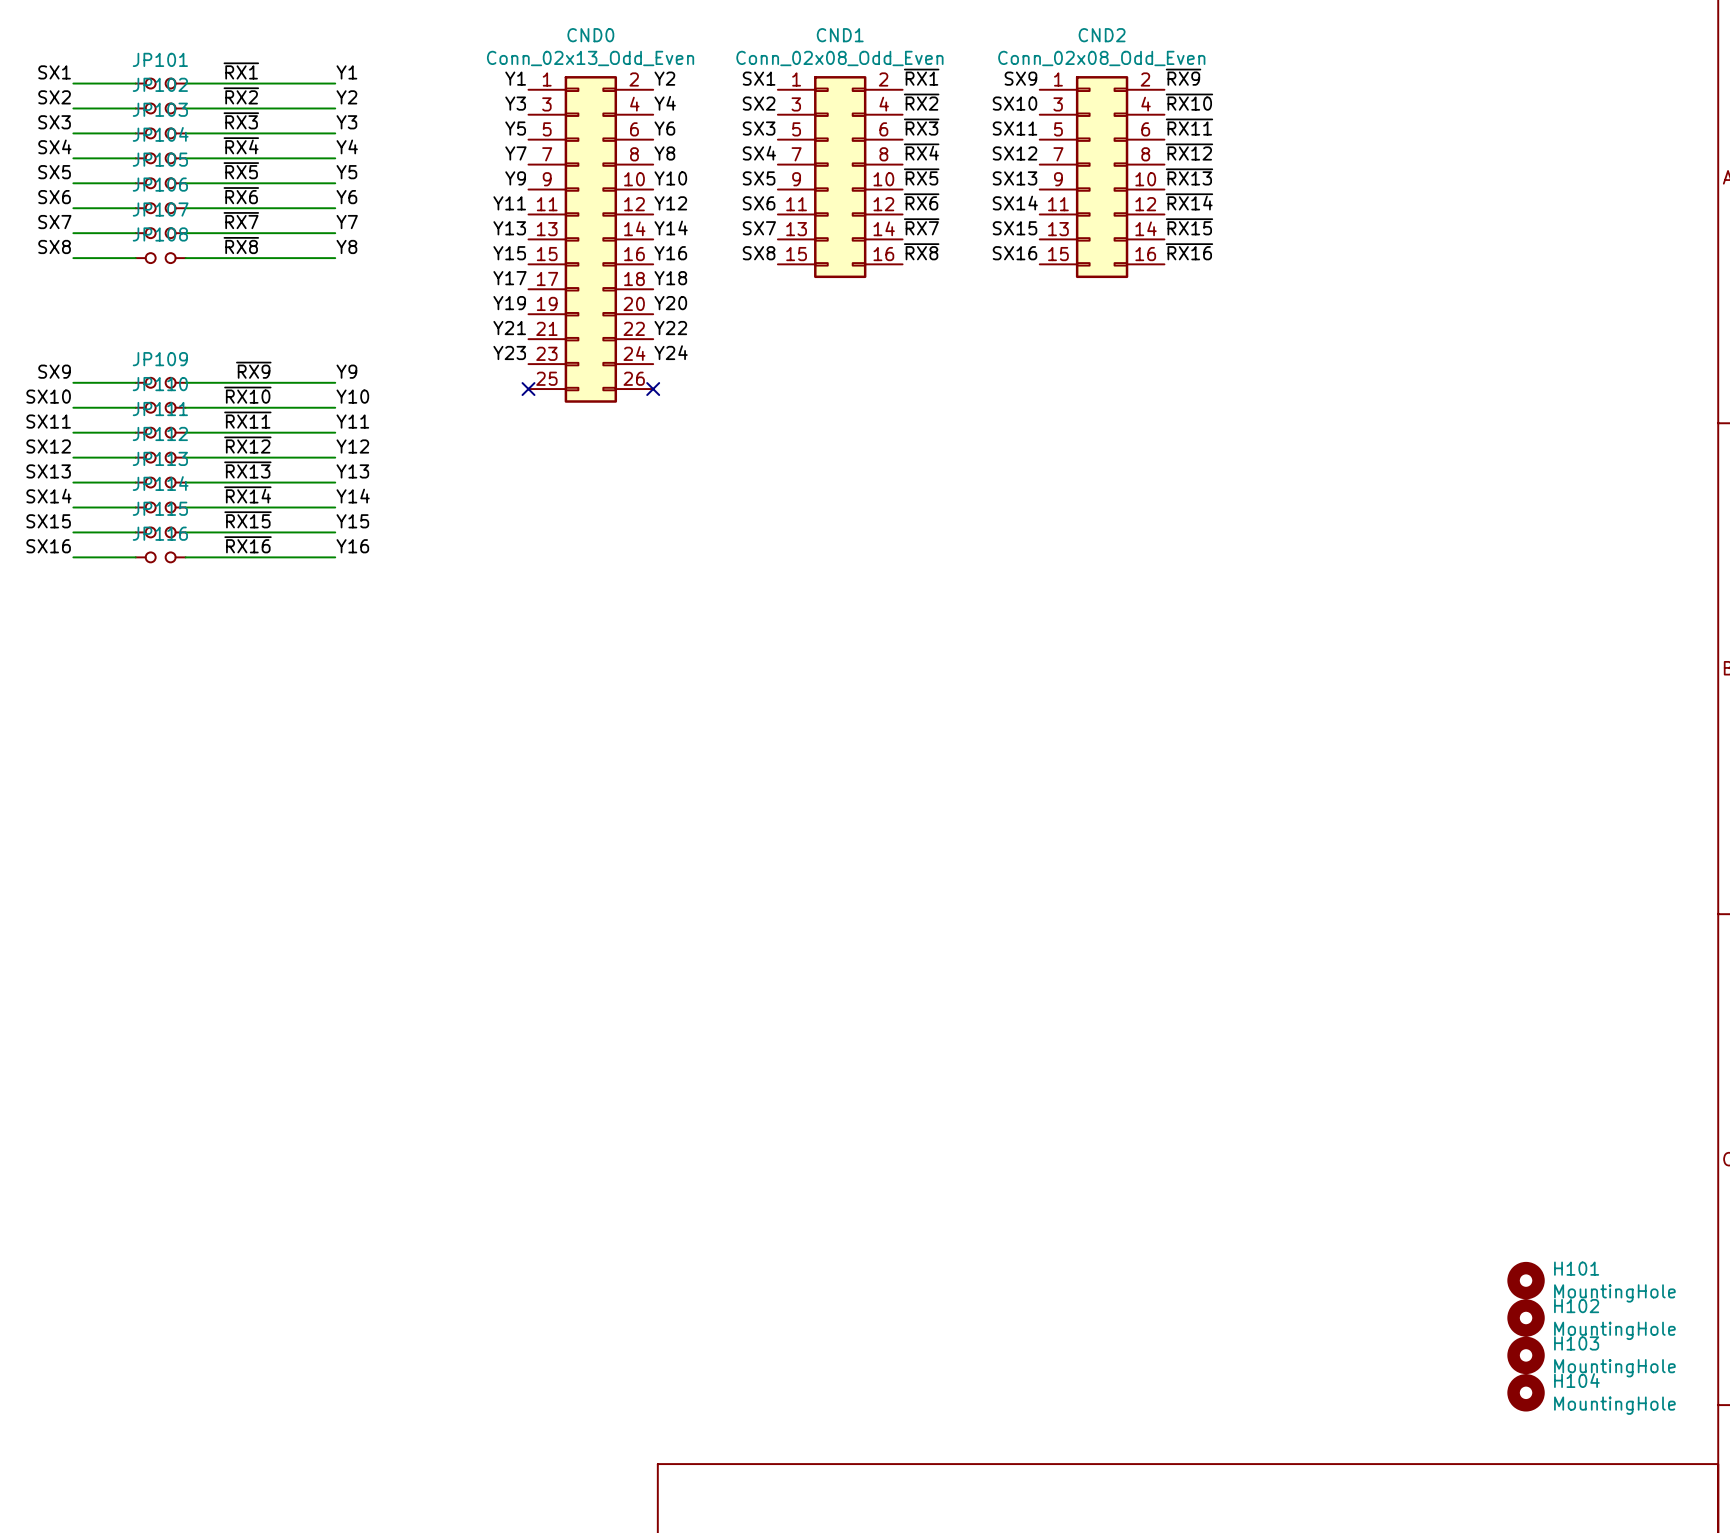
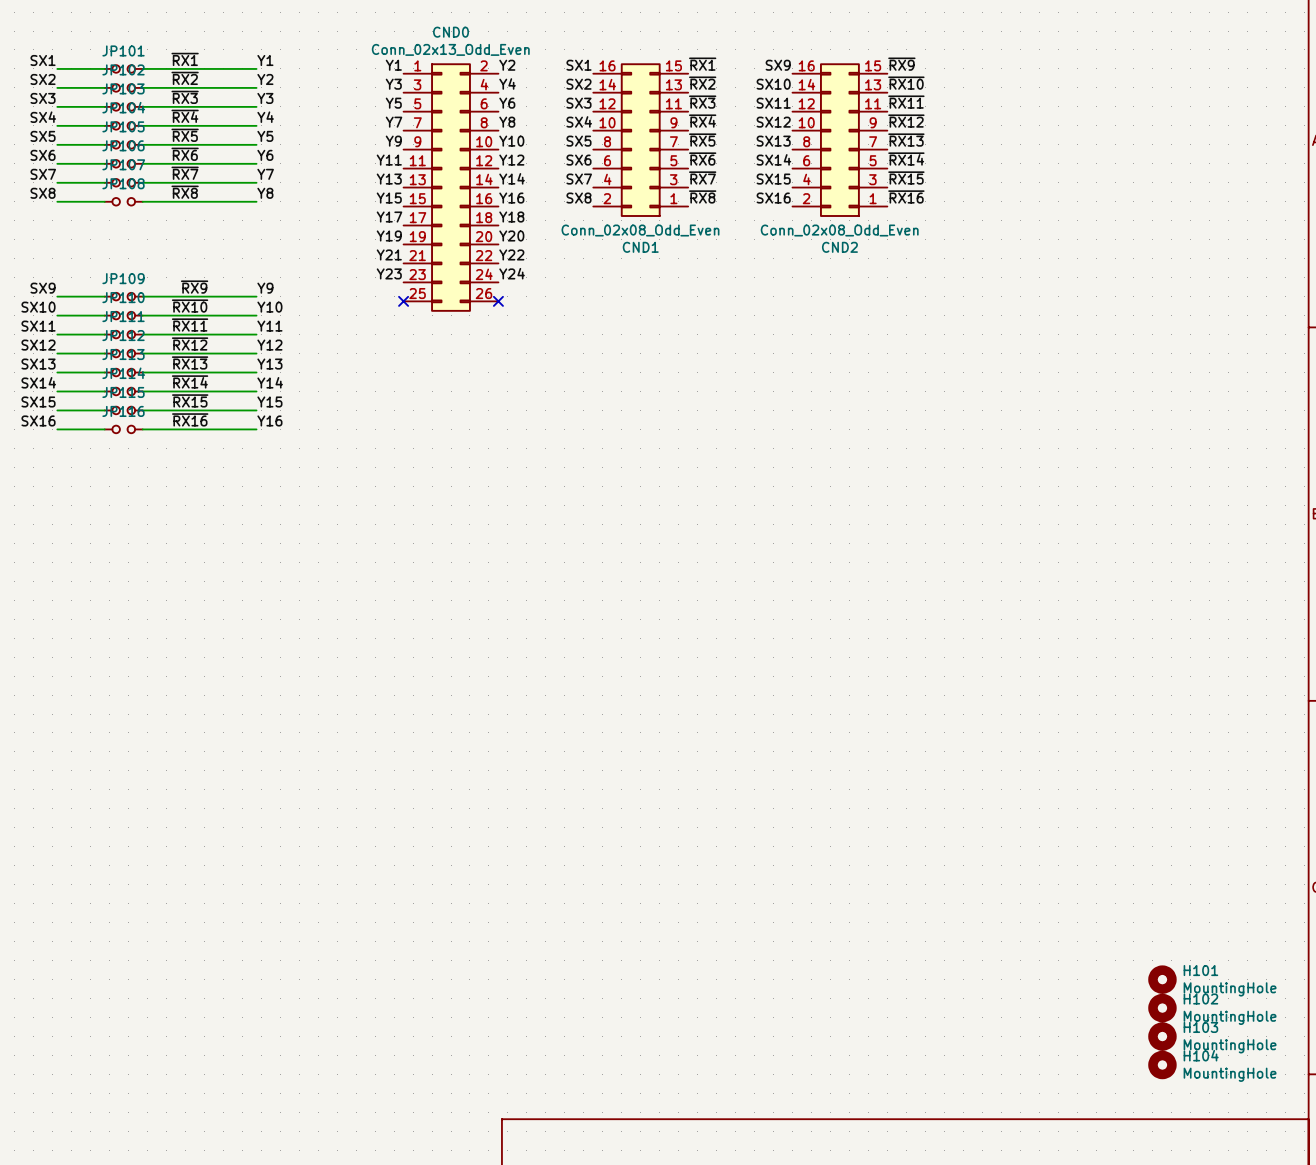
CND1 rotation: 0° (840, 177) -> 180° (640, 140)
CND2 rotation: 0° (1102, 177) -> 180° (839, 140)

